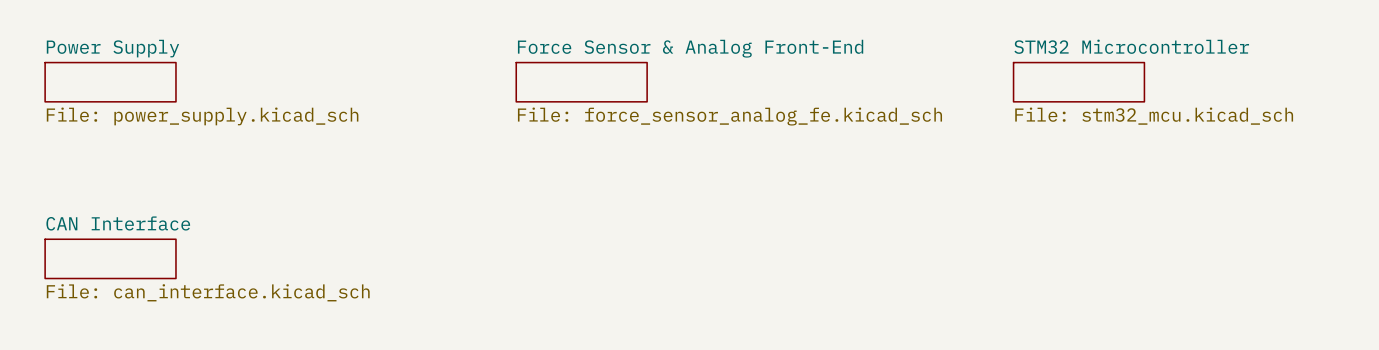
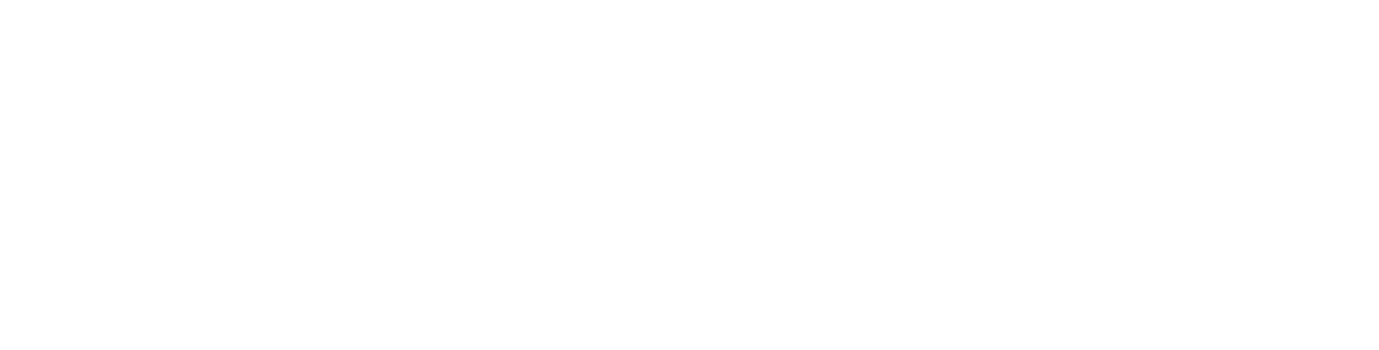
sheet Power Supply: File: power_supply.kicad_sch (110, 82) -> none
sheet Force Sensor & Analog Front-End: File: force_sensor_analog_fe.kicad_sch (581, 82) -> none
sheet STM32 Microcontroller: File: stm32_mcu.kicad_sch (1078, 82) -> none
sheet CAN Interface: File: can_interface.kicad_sch (110, 258) -> none

